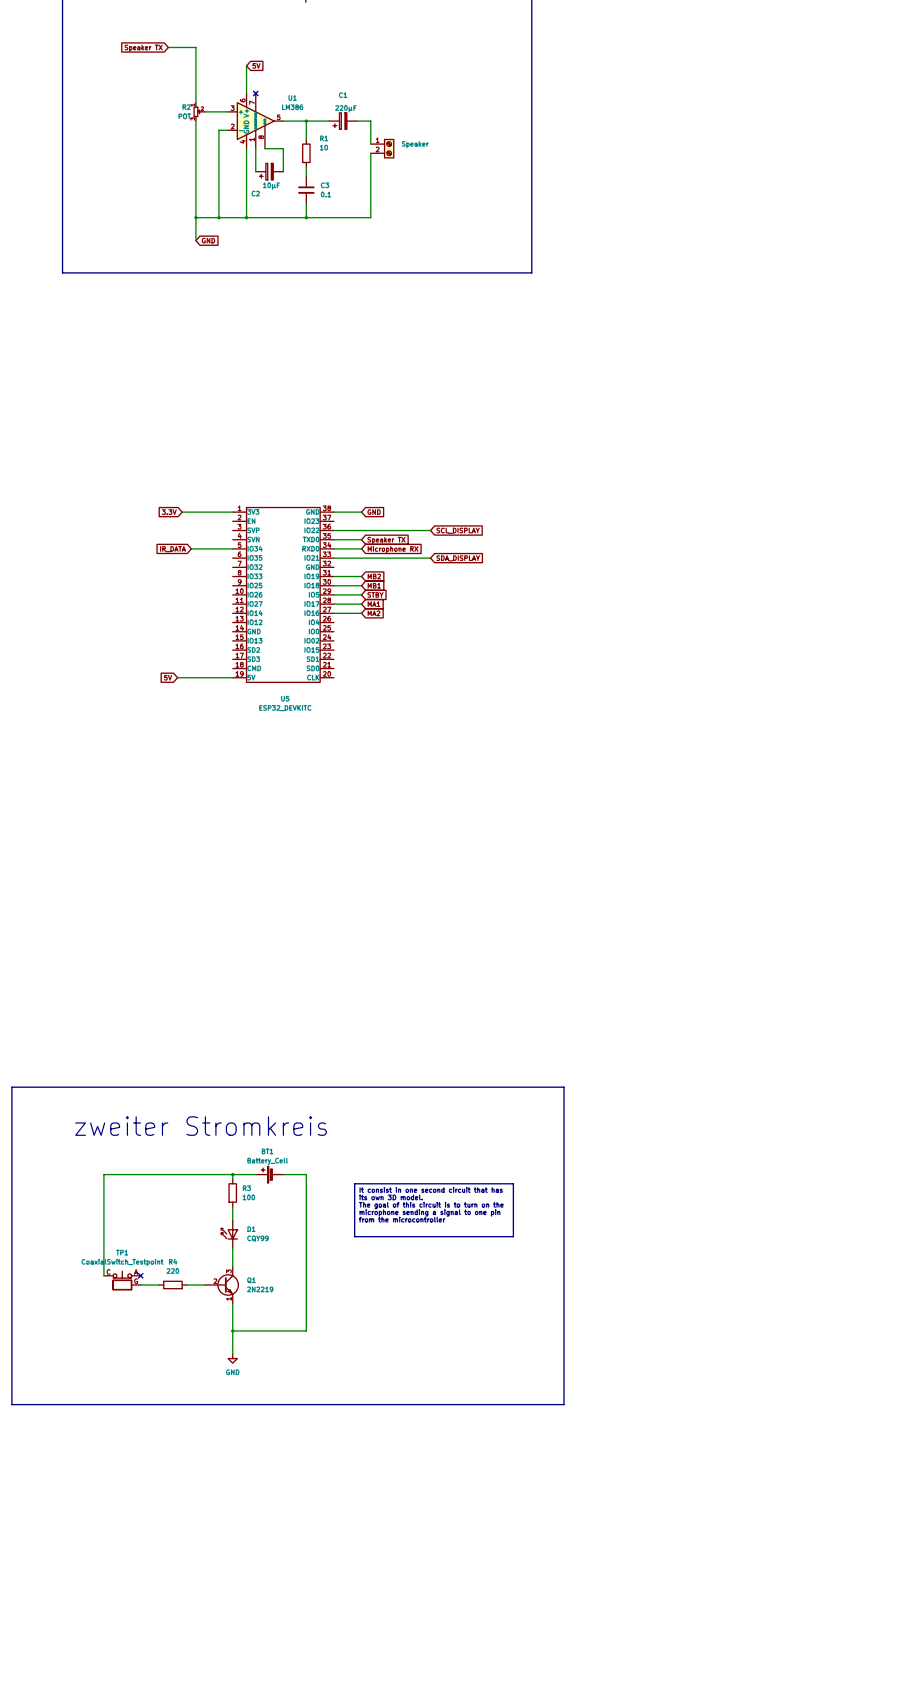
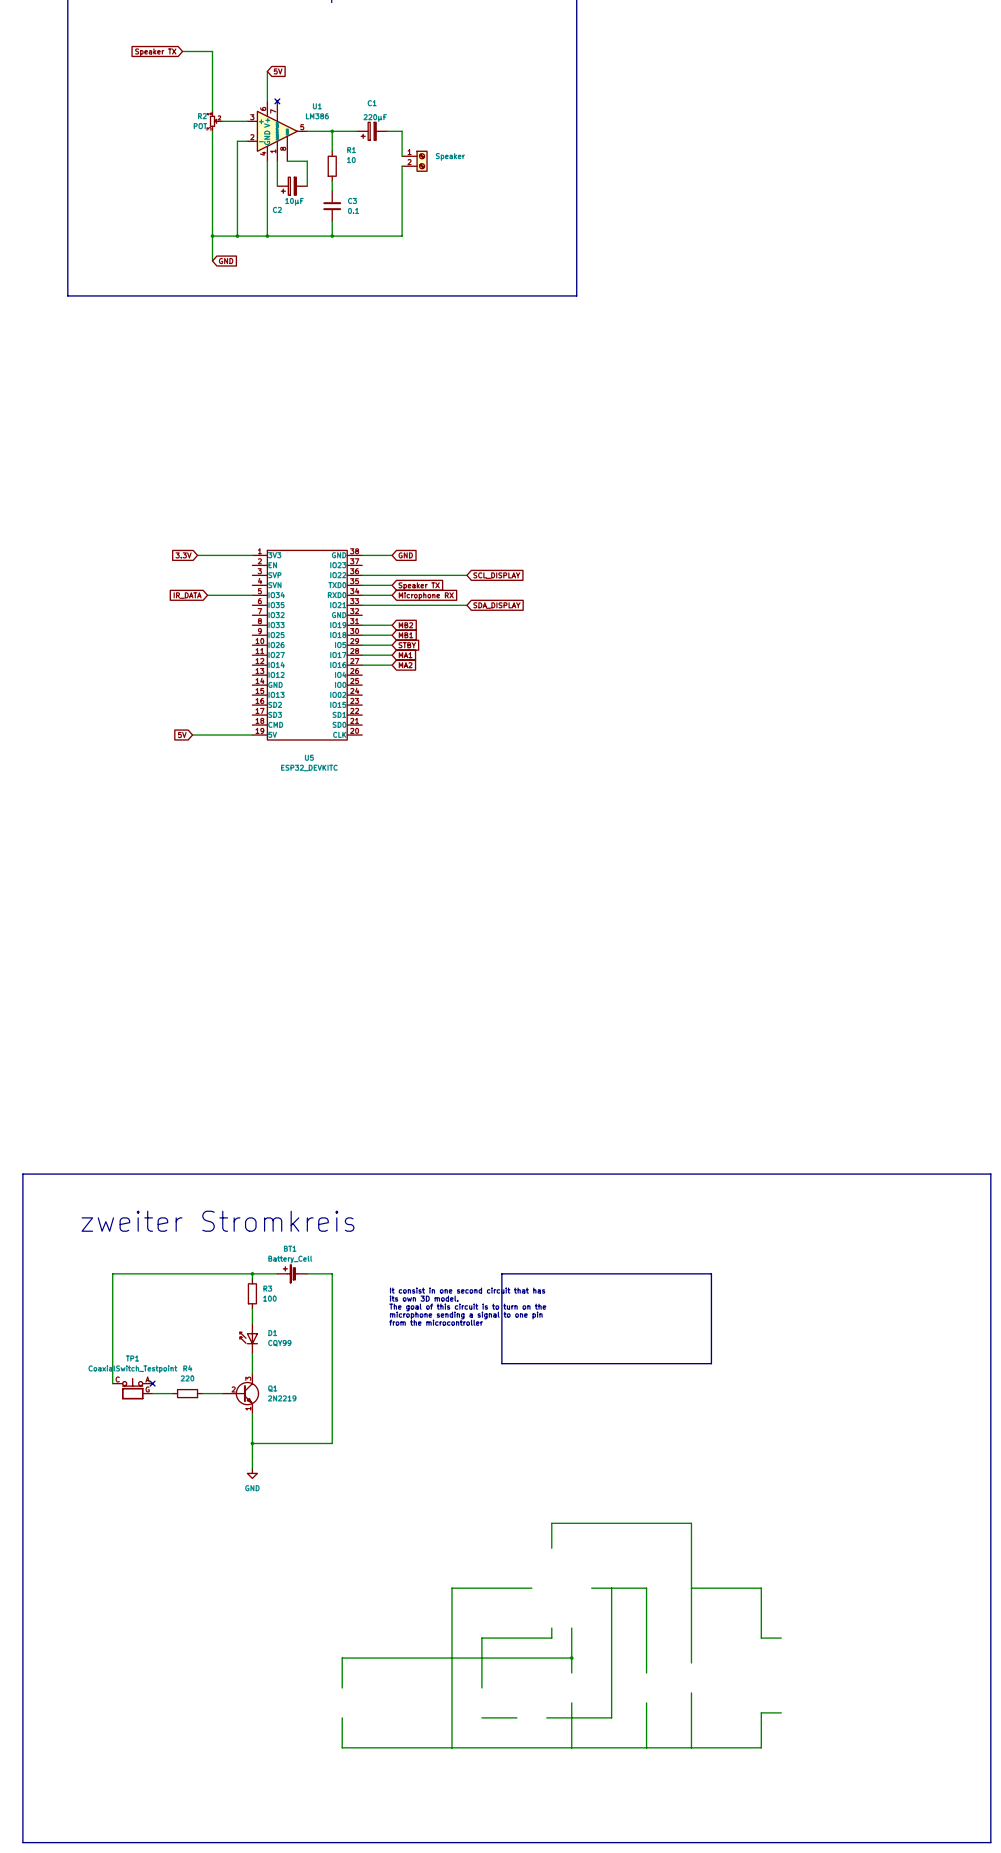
line: none -> (22, 1174) (990, 1174) (990, 1842) (22, 1842) (22, 1174)
line: (11, 1087) (563, 1087) (563, 1404) (11, 1404) (11, 1087) -> none
line: none -> (501, 1273) (711, 1273) (711, 1363) (501, 1363) (501, 1273)
line: (354, 1183) (513, 1183) (513, 1236) (354, 1236) (354, 1183) -> none
wire: none -> (551, 1548) (551, 1523) (691, 1523) (691, 1663)
wire: none -> (531, 1588) (451, 1588) (451, 1747)
wire: none -> (591, 1588) (646, 1588) (646, 1672)
wire: none -> (611, 1588) (611, 1717) (546, 1717)
wire: none -> (691, 1588) (761, 1588) (761, 1638) (781, 1638)
wire: none -> (551, 1628) (551, 1638) (481, 1638) (481, 1687)
wire: none -> (571, 1628) (571, 1672)
wire: none -> (571, 1658) (342, 1658) (342, 1687)
junction: none -> (571, 1658)
wire: none -> (691, 1692) (691, 1747)
wire: none -> (571, 1702) (571, 1747)
wire: none -> (646, 1702) (646, 1747)
wire: none -> (781, 1712) (761, 1712) (761, 1747) (342, 1747) (342, 1717)
wire: none -> (481, 1717) (516, 1717)

